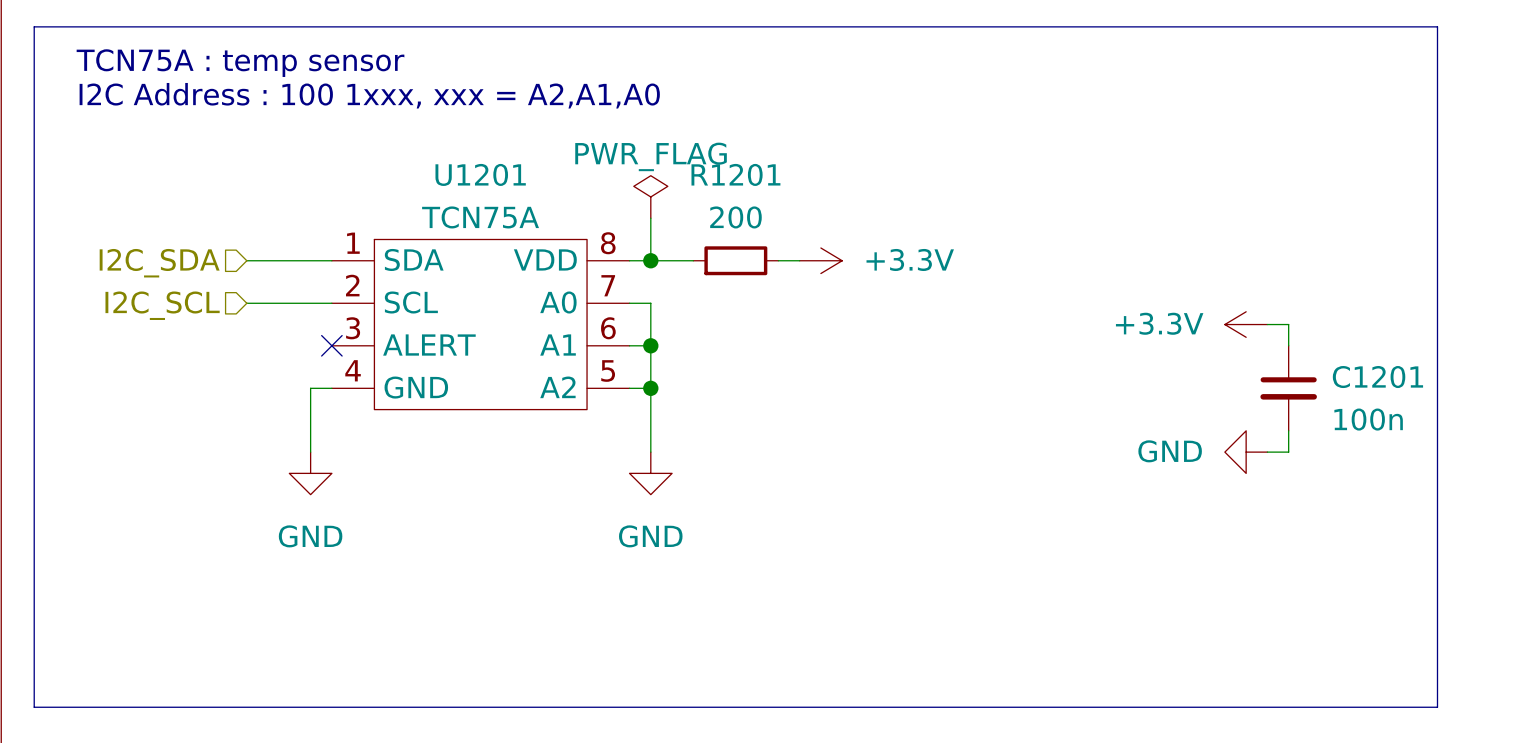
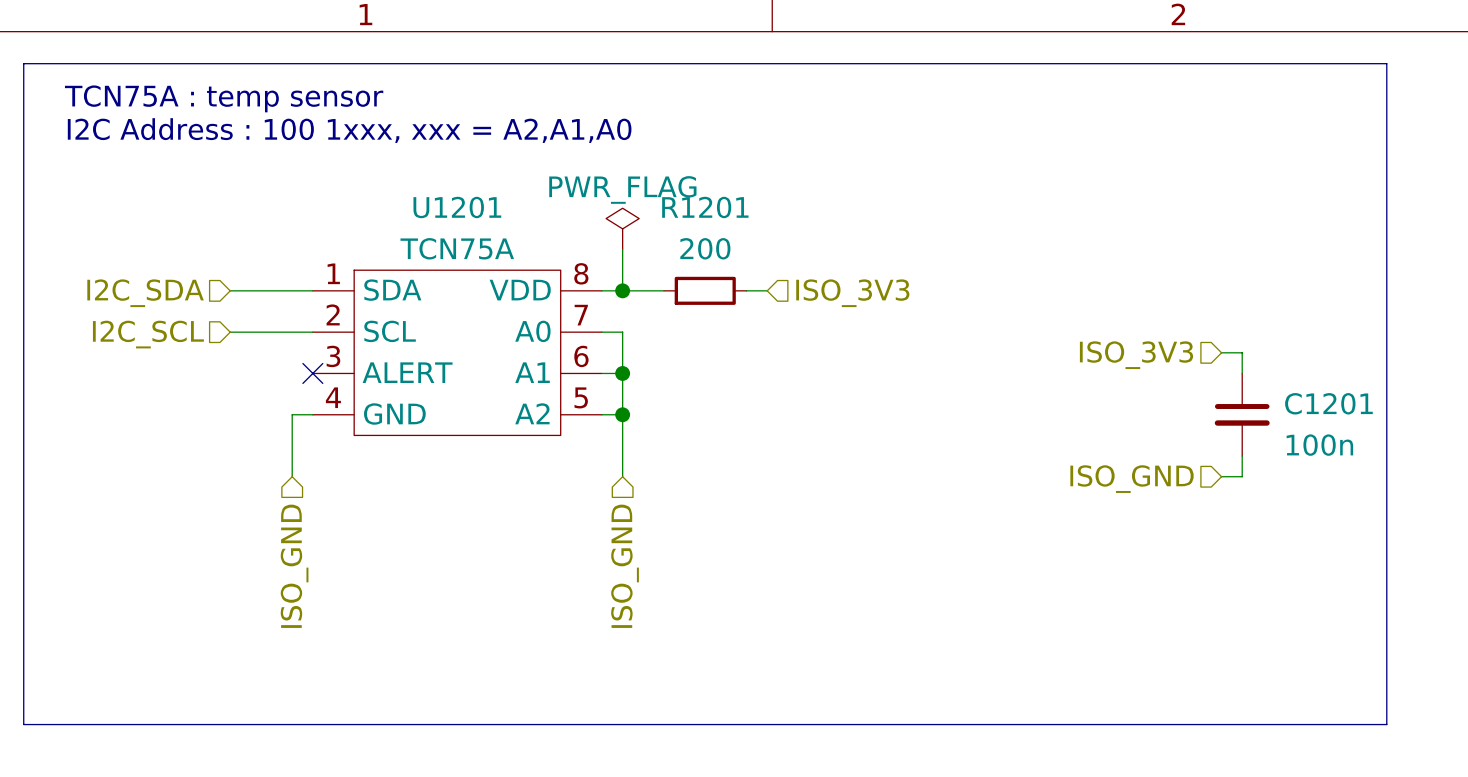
power symbol: +3.3V (820, 260) -> none
hierarchical label: none -> ISO_3V3 (852, 293)
power symbol: +3.3V (1246, 324) -> none
hierarchical label: none -> ISO_3V3 (1136, 355)
power symbol: GND (1246, 452) -> none
hierarchical label: none -> ISO_GND (1132, 479)
power symbol: GND (310, 473) -> none
power symbol: GND (650, 473) -> none
hierarchical label: none -> ISO_GND (294, 566)
hierarchical label: none -> ISO_GND (625, 566)

